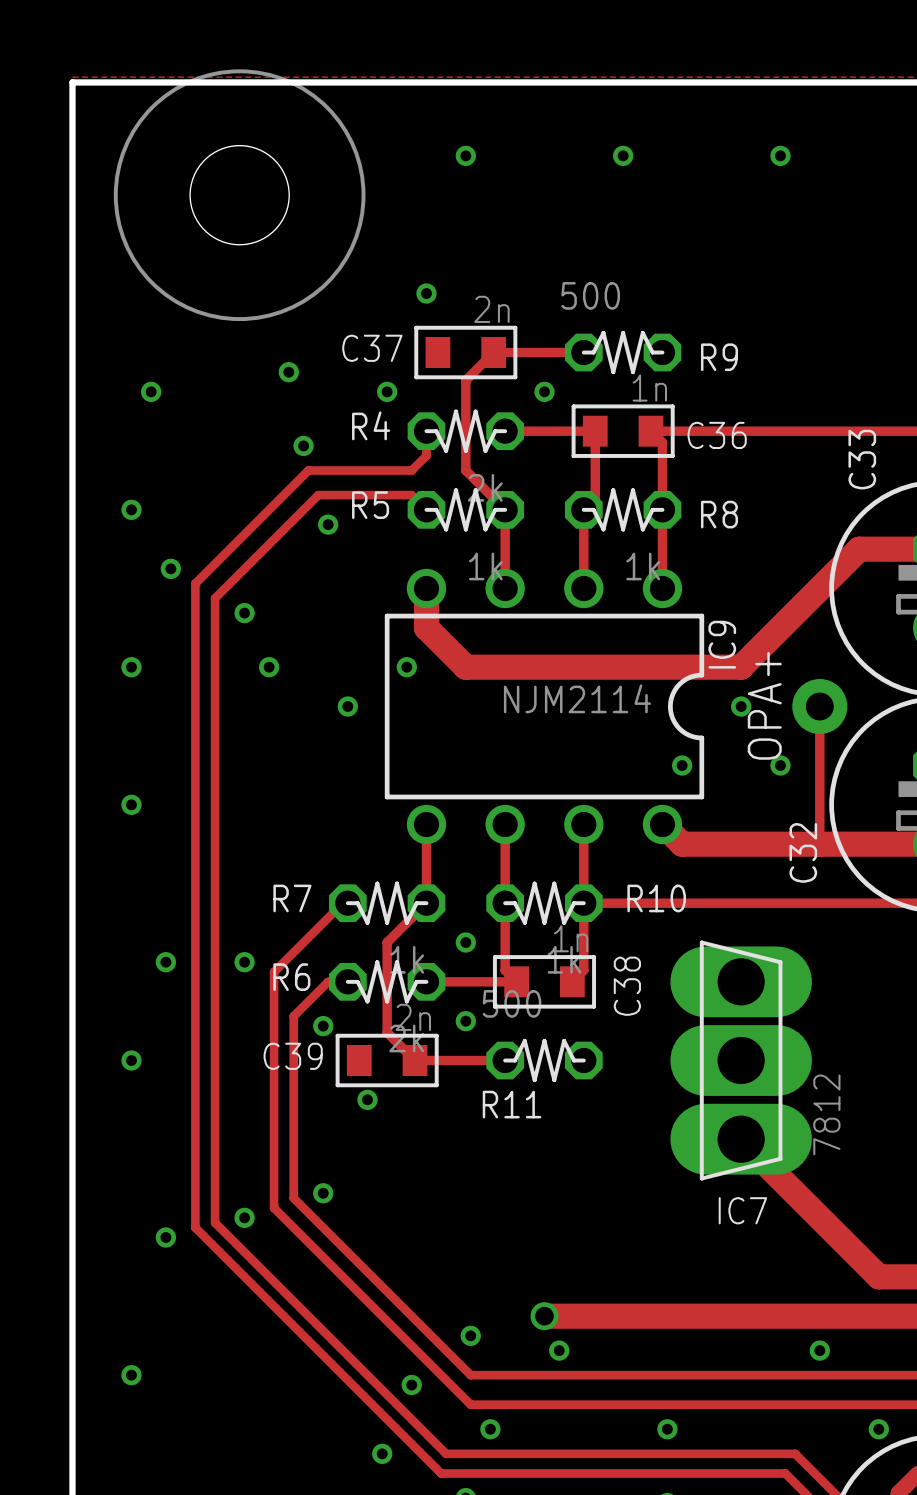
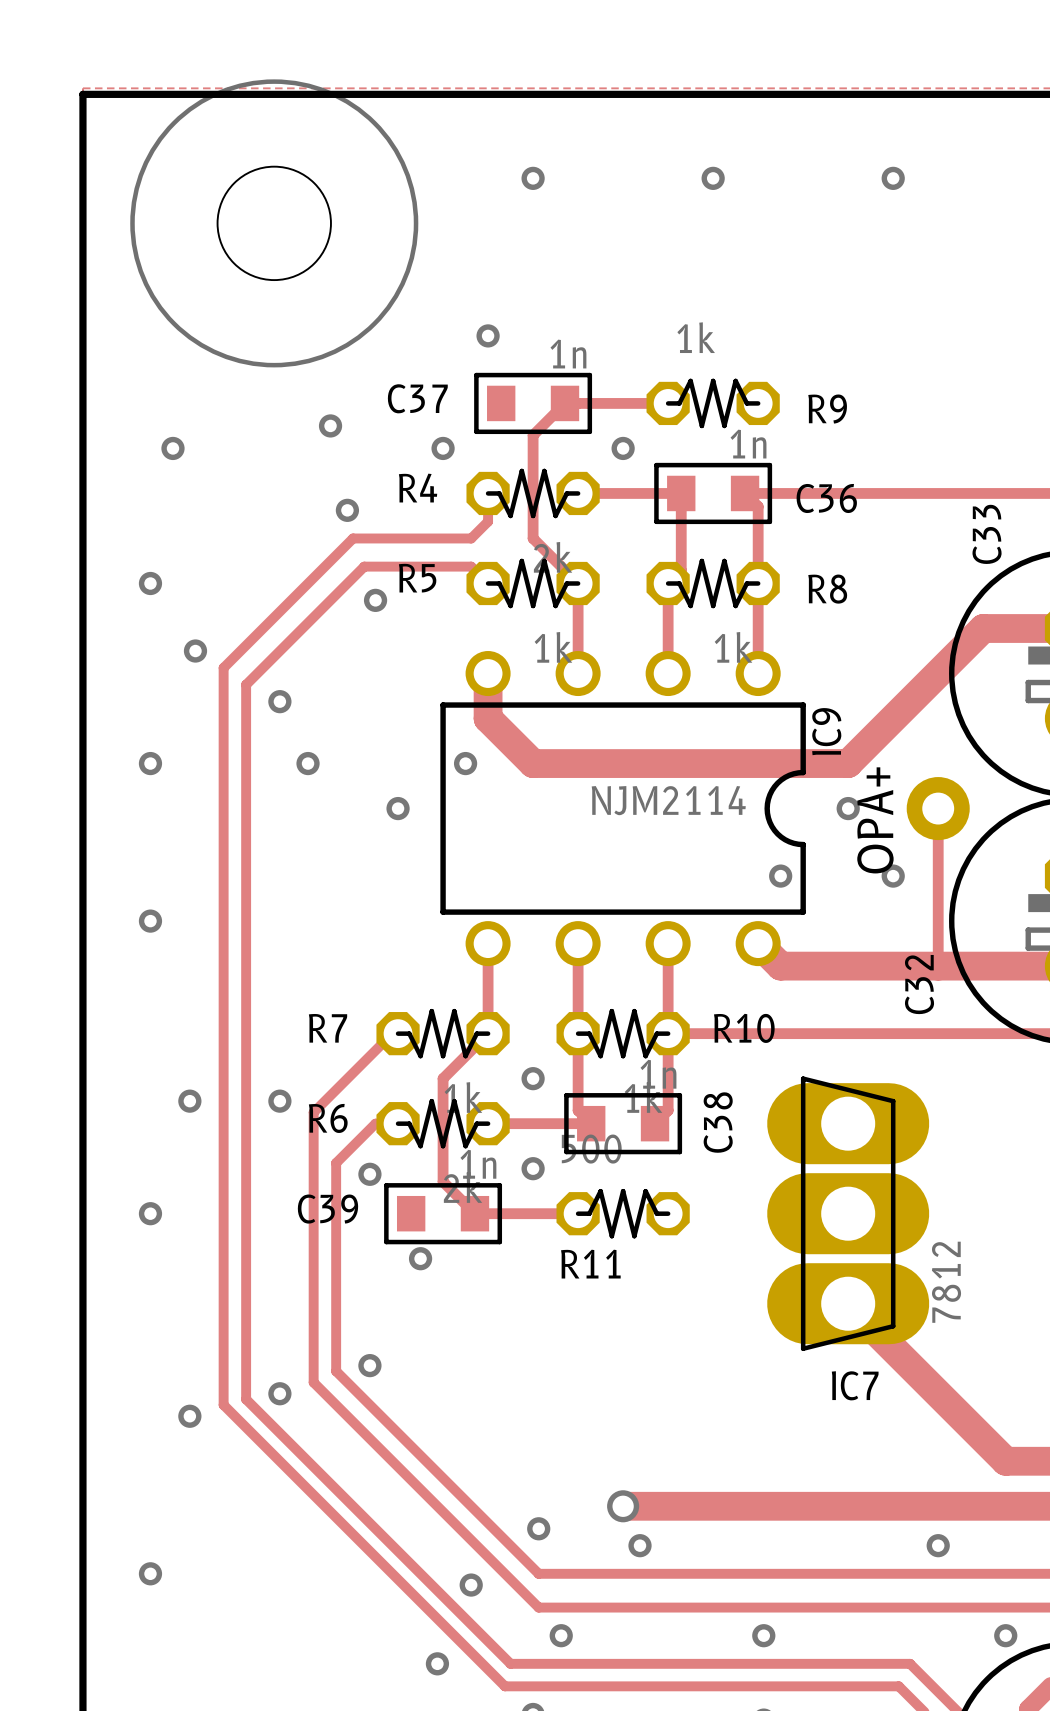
R9 value: 500 (590, 295) -> 1k (696, 337)
C37 value: 2n (491, 309) -> 1n (568, 354)
C39 value: 2n (413, 1017) -> 1n (478, 1164)

